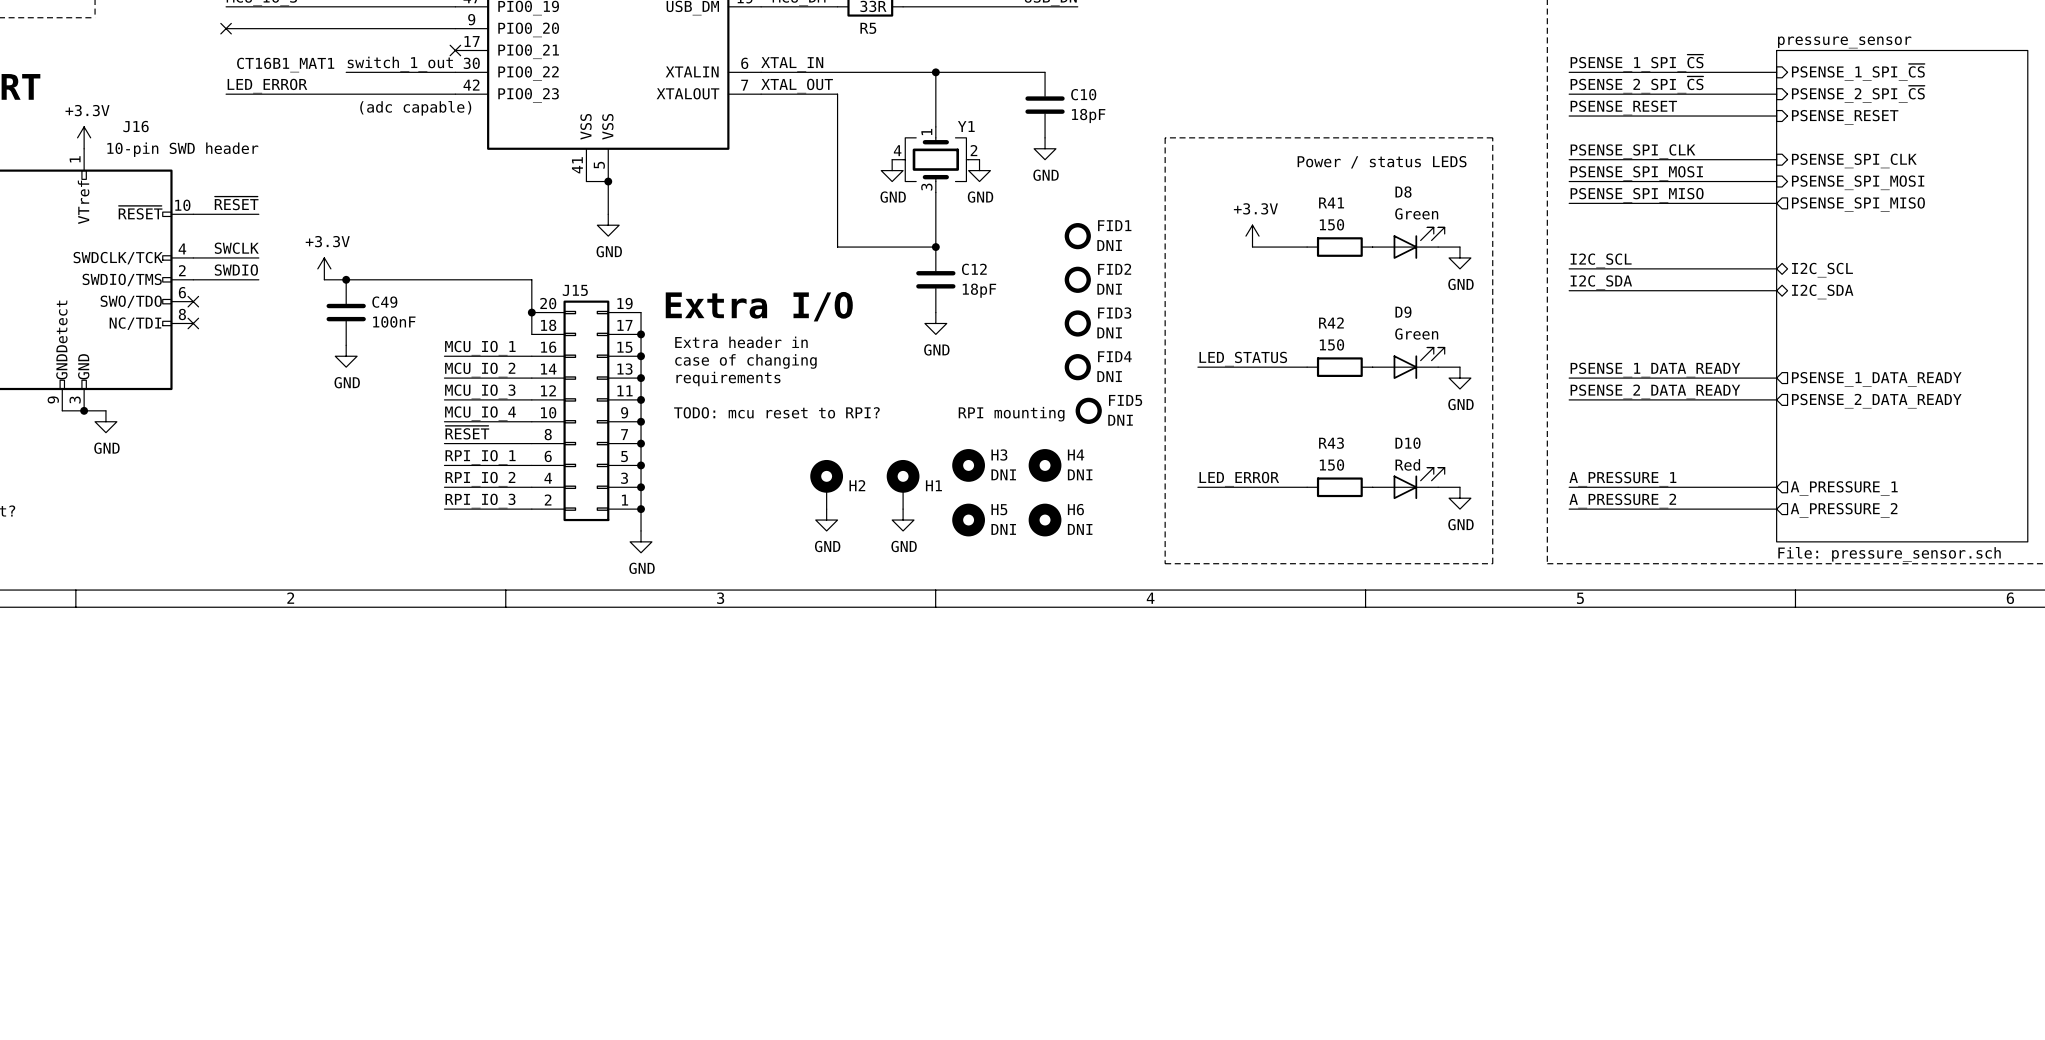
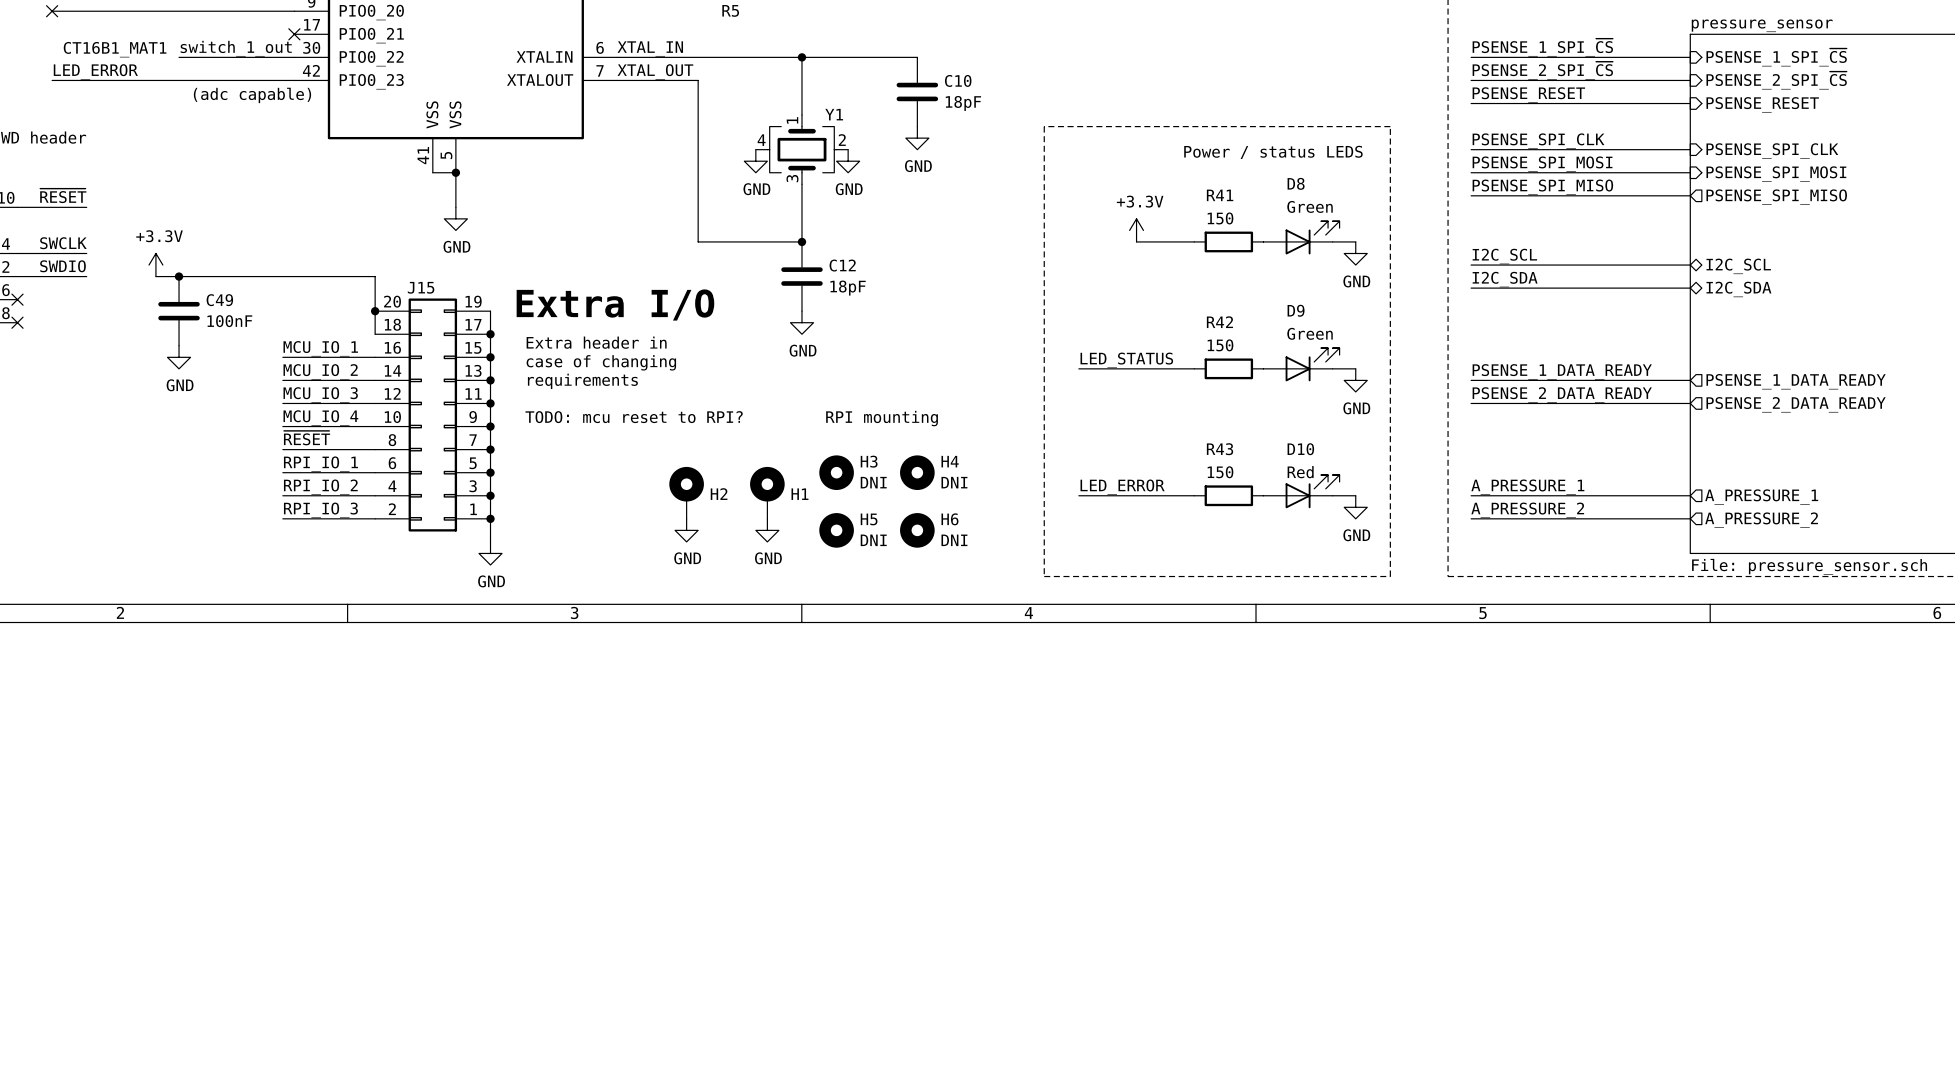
FID1: DNI (1077, 236) -> none
FID2: DNI (1077, 279) -> none
FID3: DNI (1077, 323) -> none
FID4: DNI (1077, 367) -> none
FID5: DNI (1088, 410) -> none

